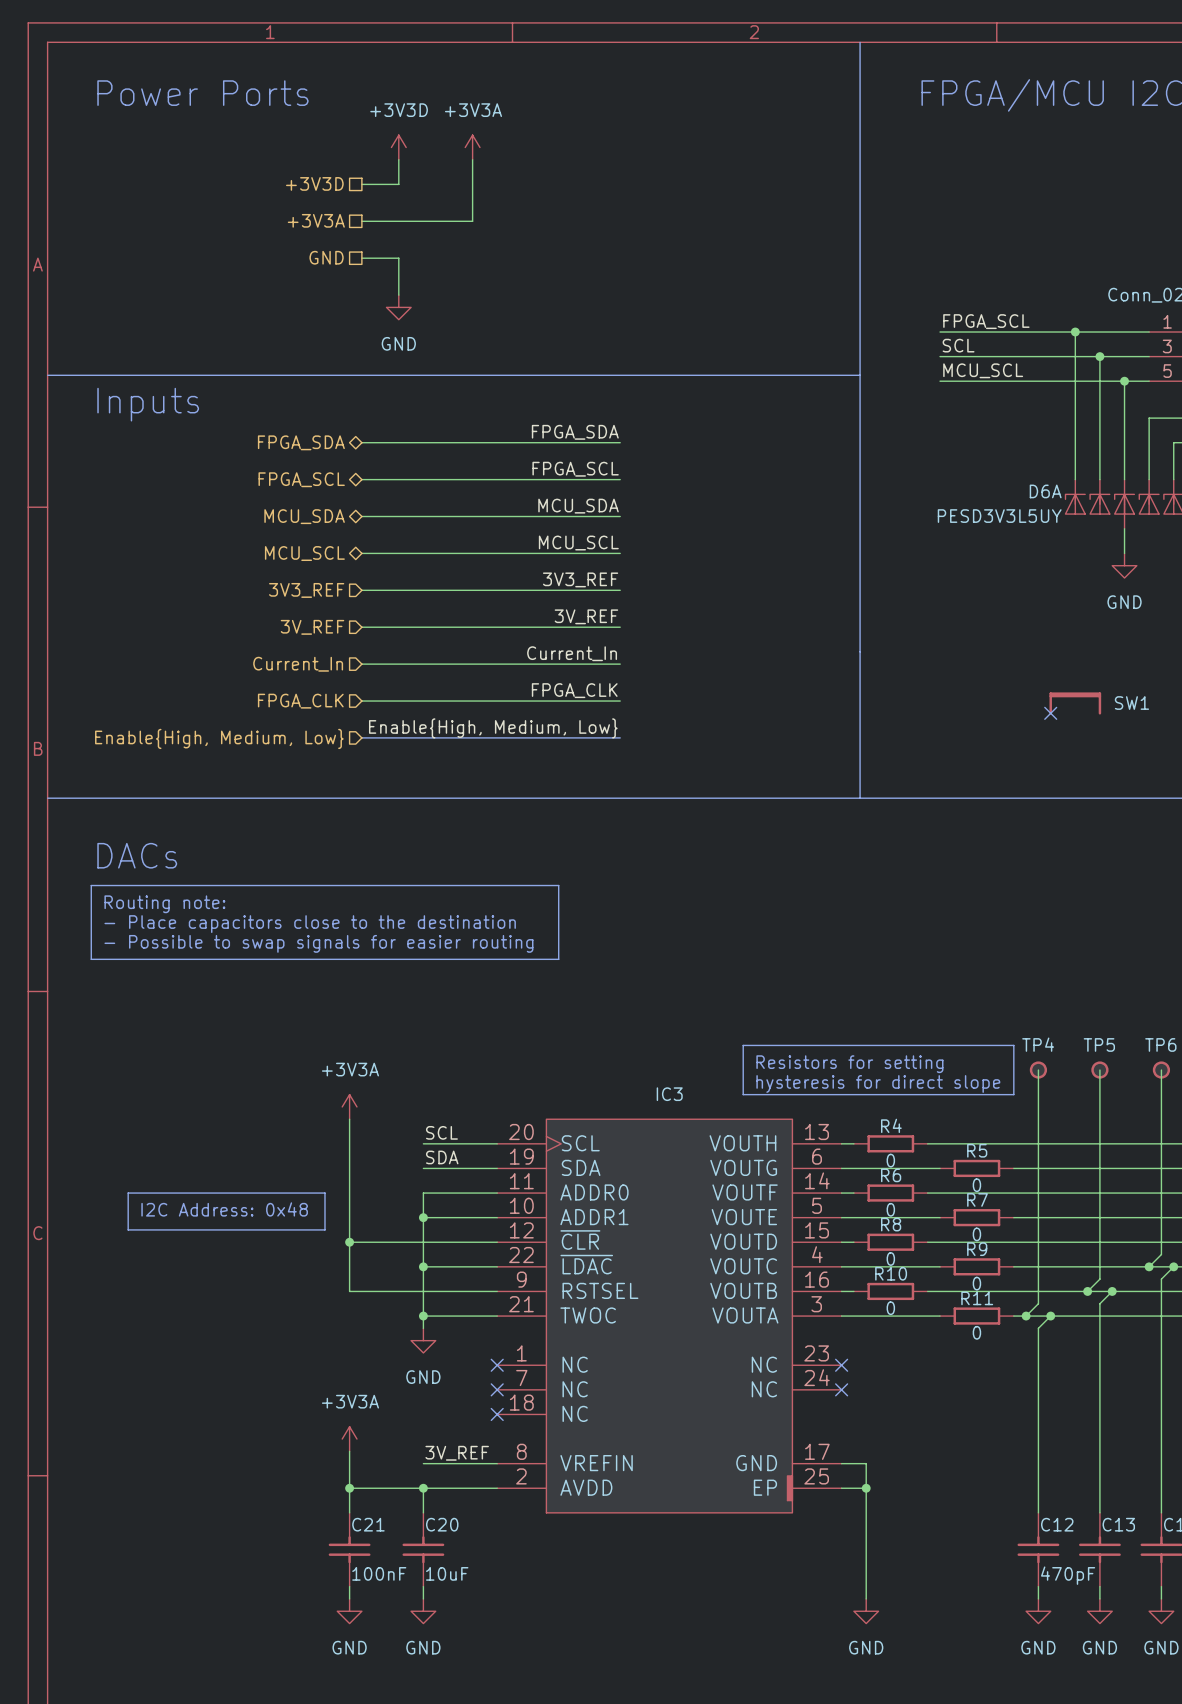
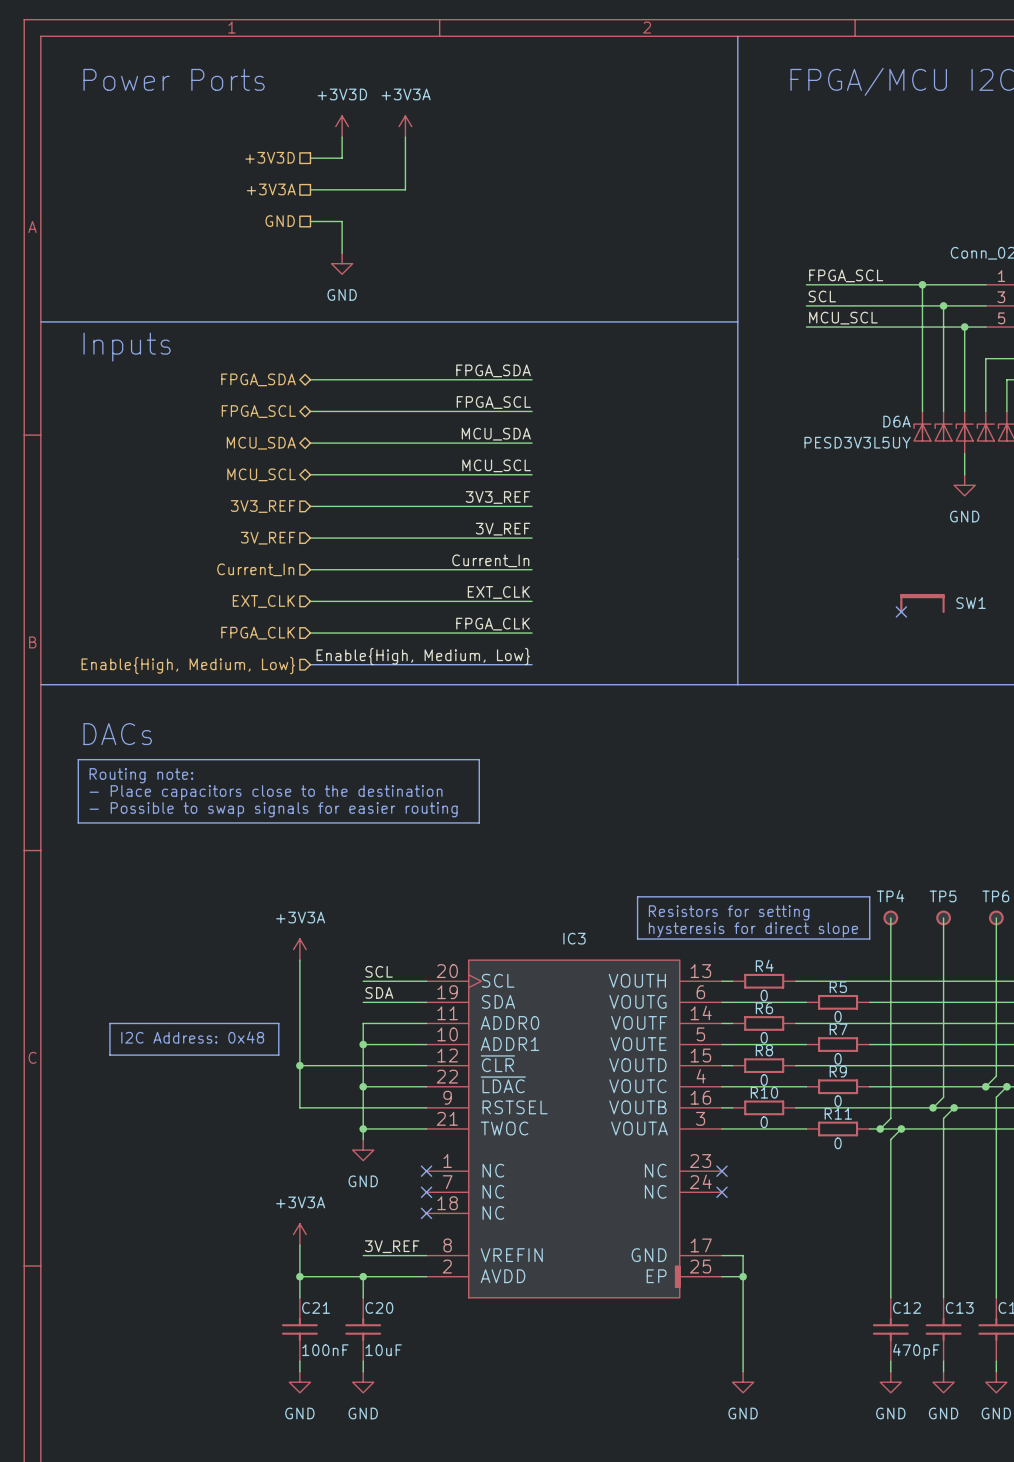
label: FPGA_CLK (574, 690) -> EXT_CLK (498, 592)
hierarchical label: FPGA_CLK (300, 701) -> EXT_CLK (263, 601)
label: Enable{High, Medium, Low} (493, 728) -> FPGA_CLK (493, 624)
bus: (361, 737) (620, 737) -> (310, 664) (532, 664)
hierarchical label: Enable{High, Medium, Low} (219, 738) -> FPGA_CLK (258, 633)
label: none -> Enable{High, Medium, Low} (423, 656)
hierarchical label: none -> Enable{High, Medium, Low} (188, 665)

